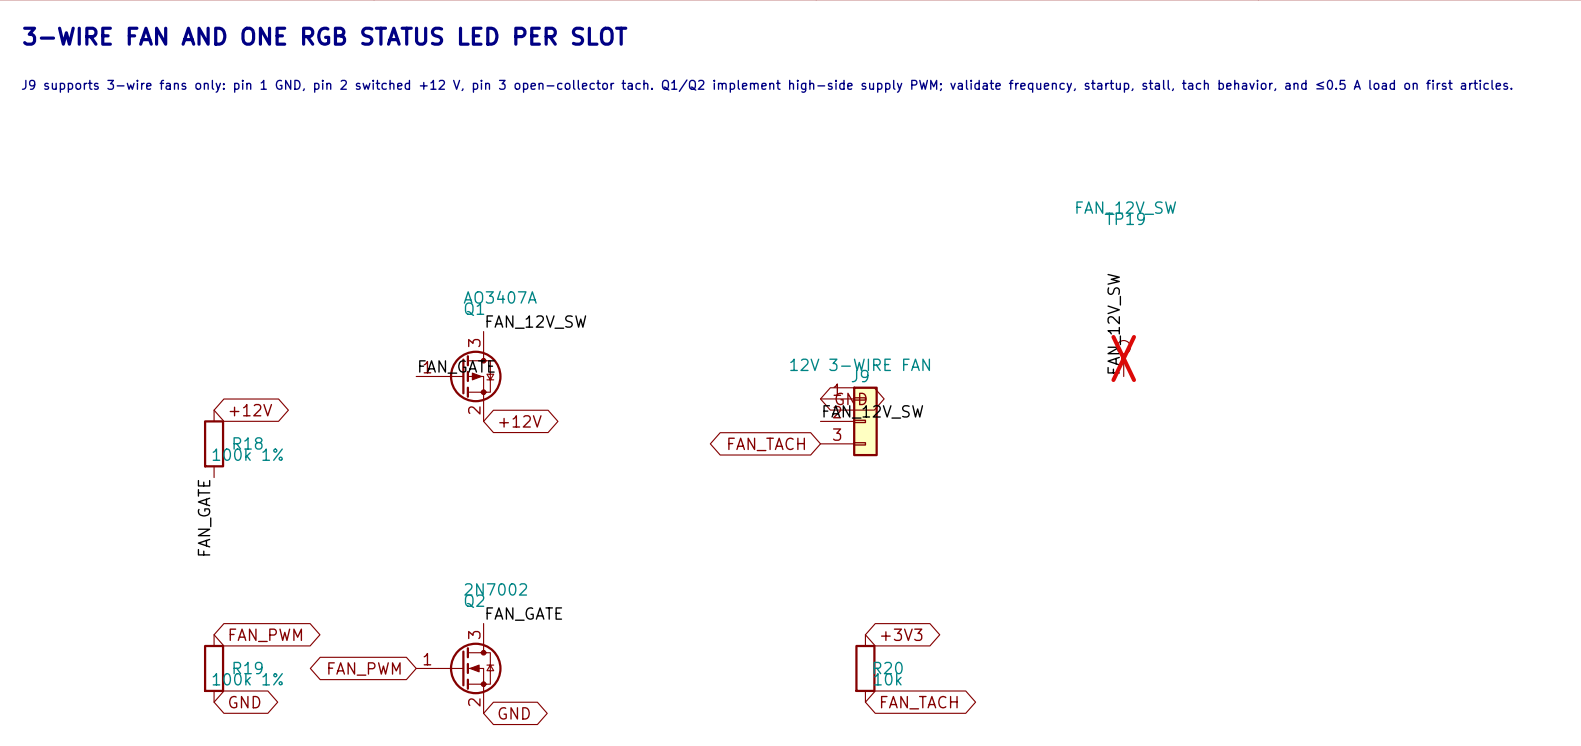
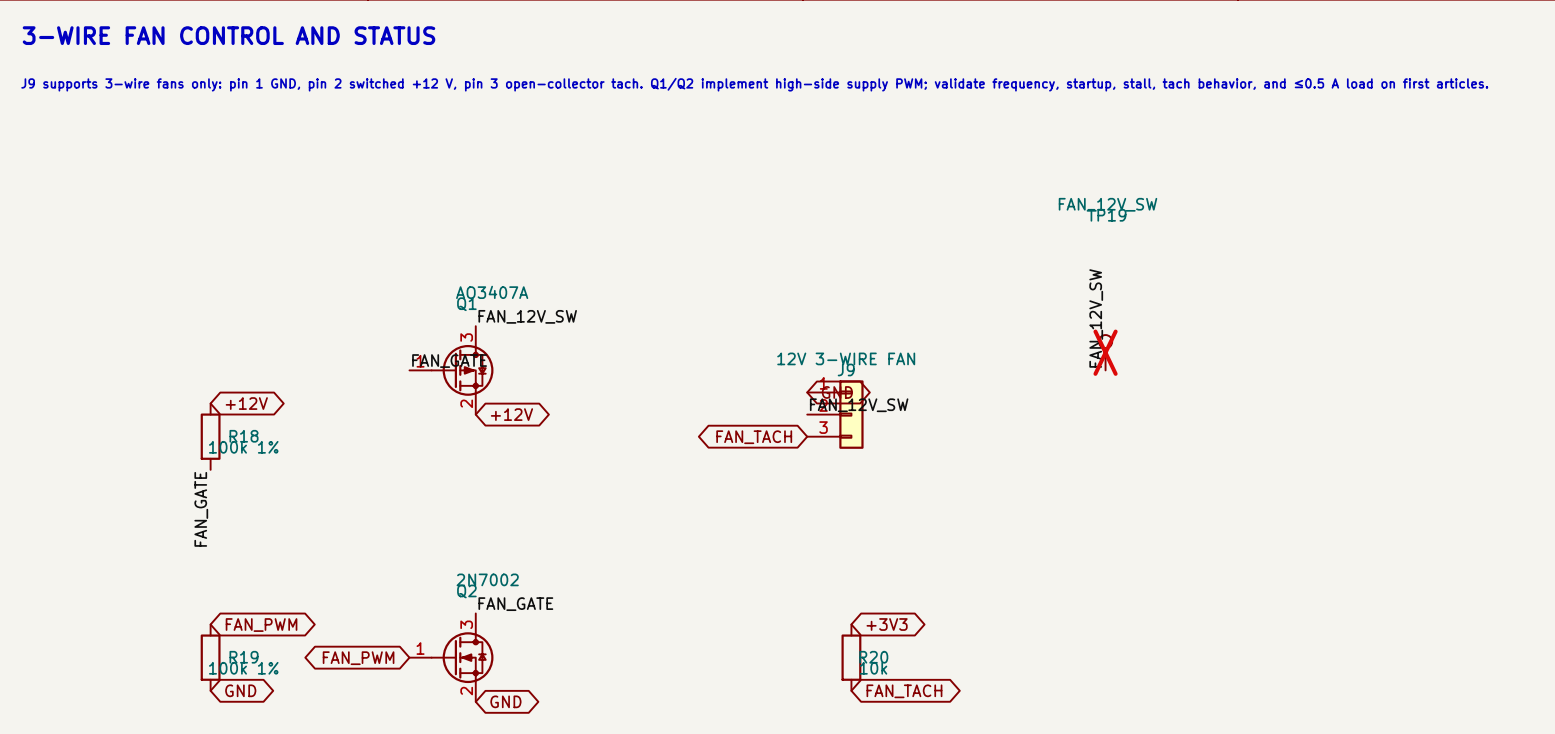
text: 3-WIRE FAN AND ONE RGB STATUS LED PER SLOT (325, 36) -> 3-WIRE FAN CONTROL AND STATUS (228, 35)

